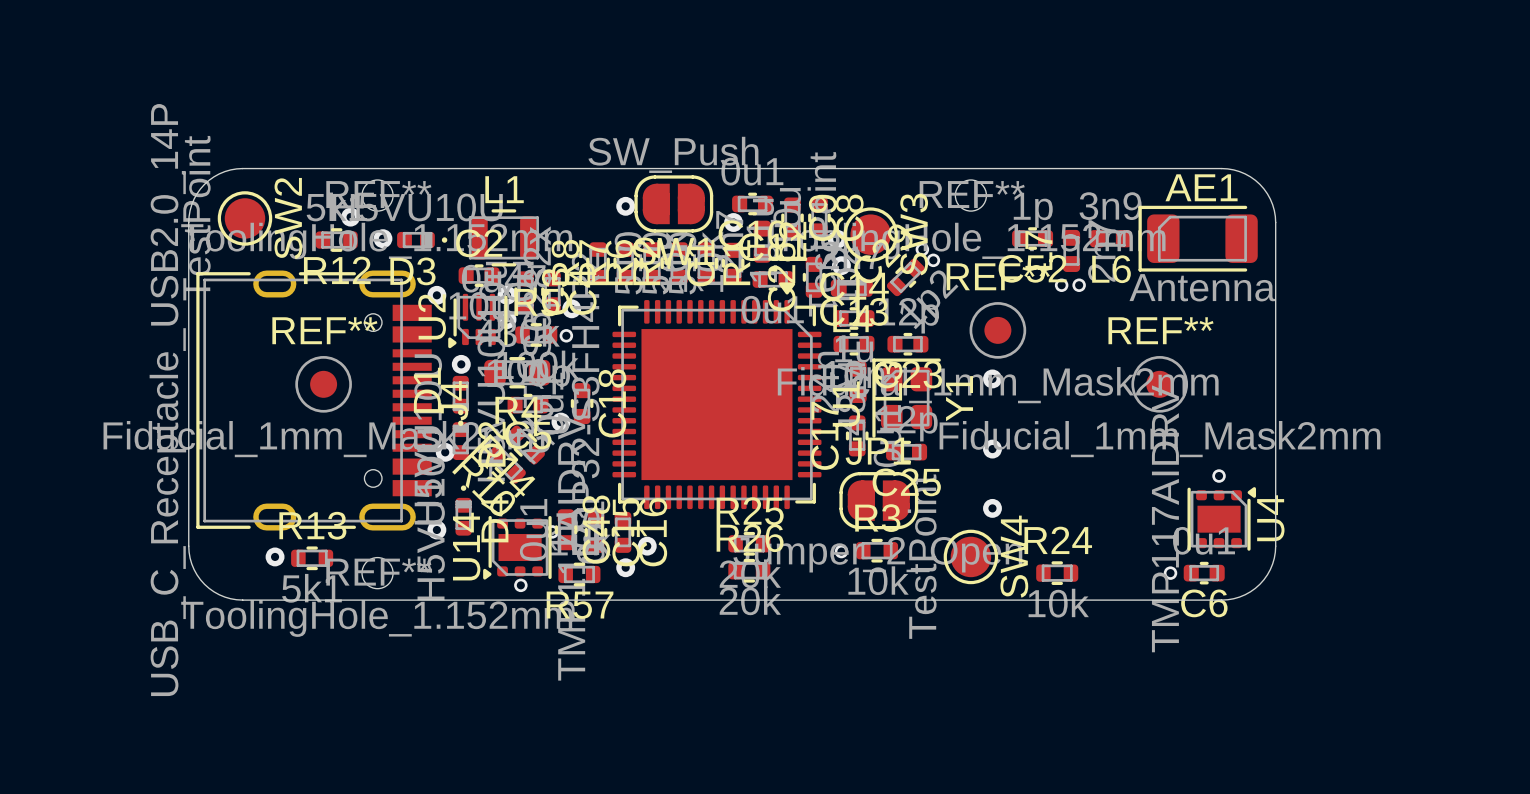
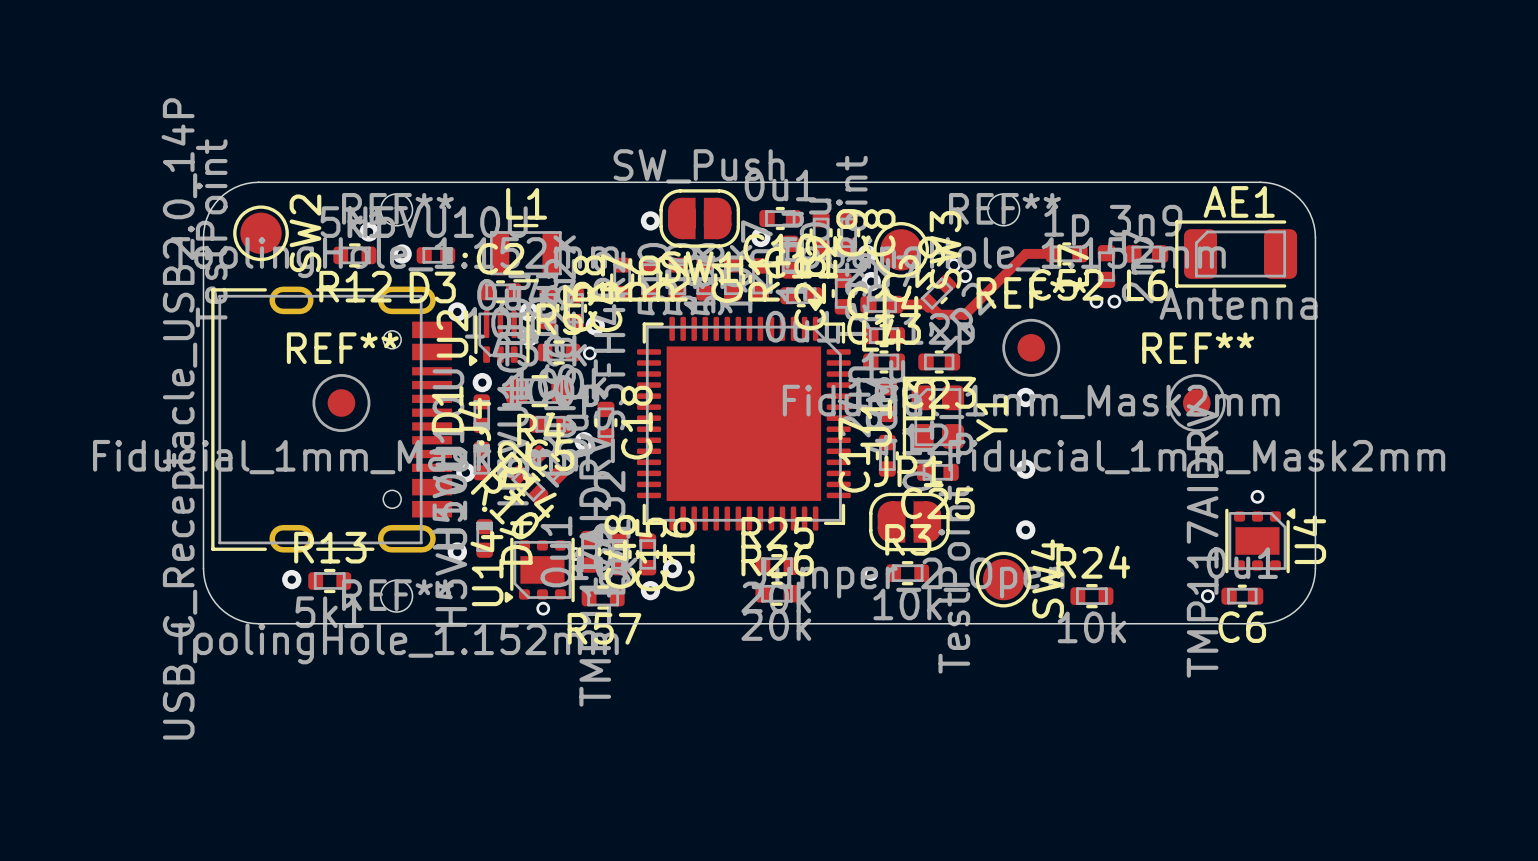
track: none -> (1053, 253) (1025, 253) (965, 314) (939, 314) (927, 302) (925, 304) (895, 304)

